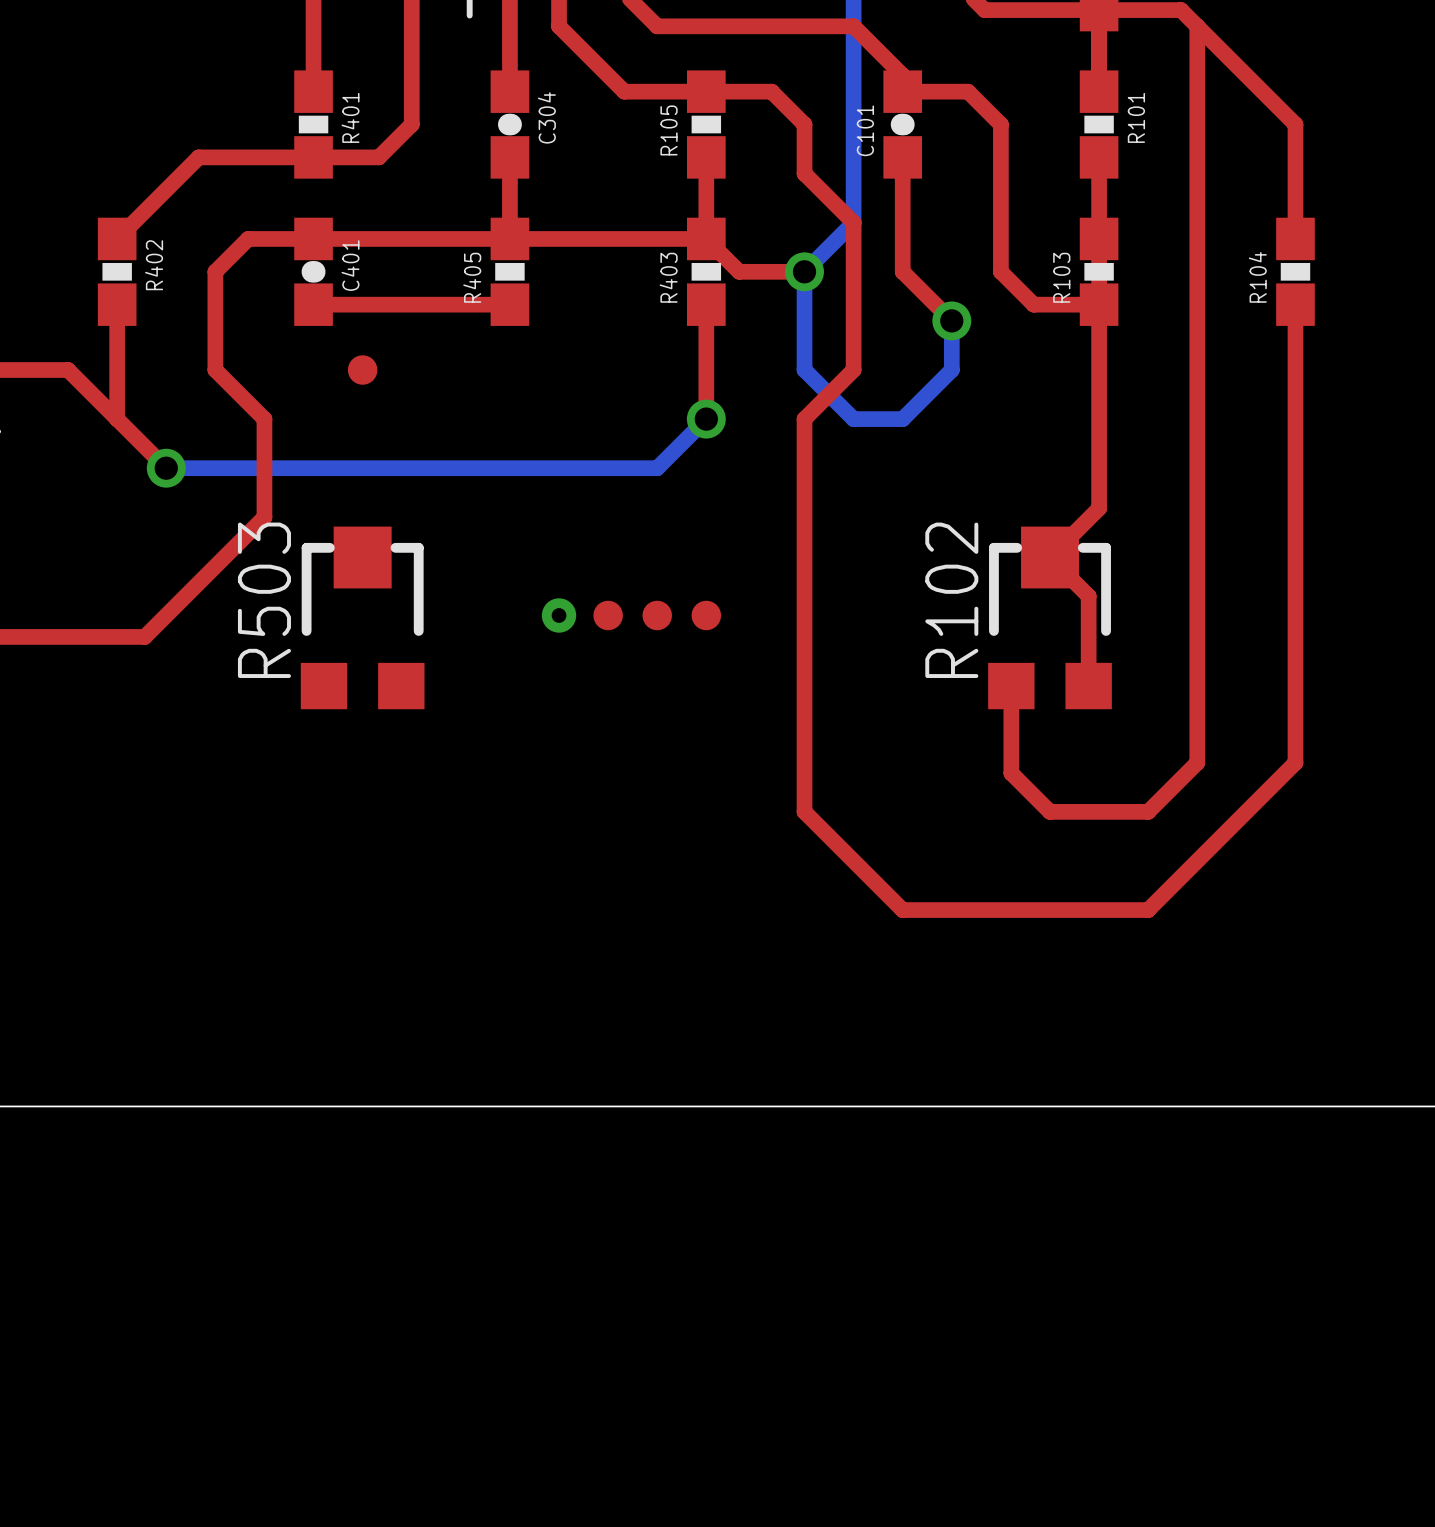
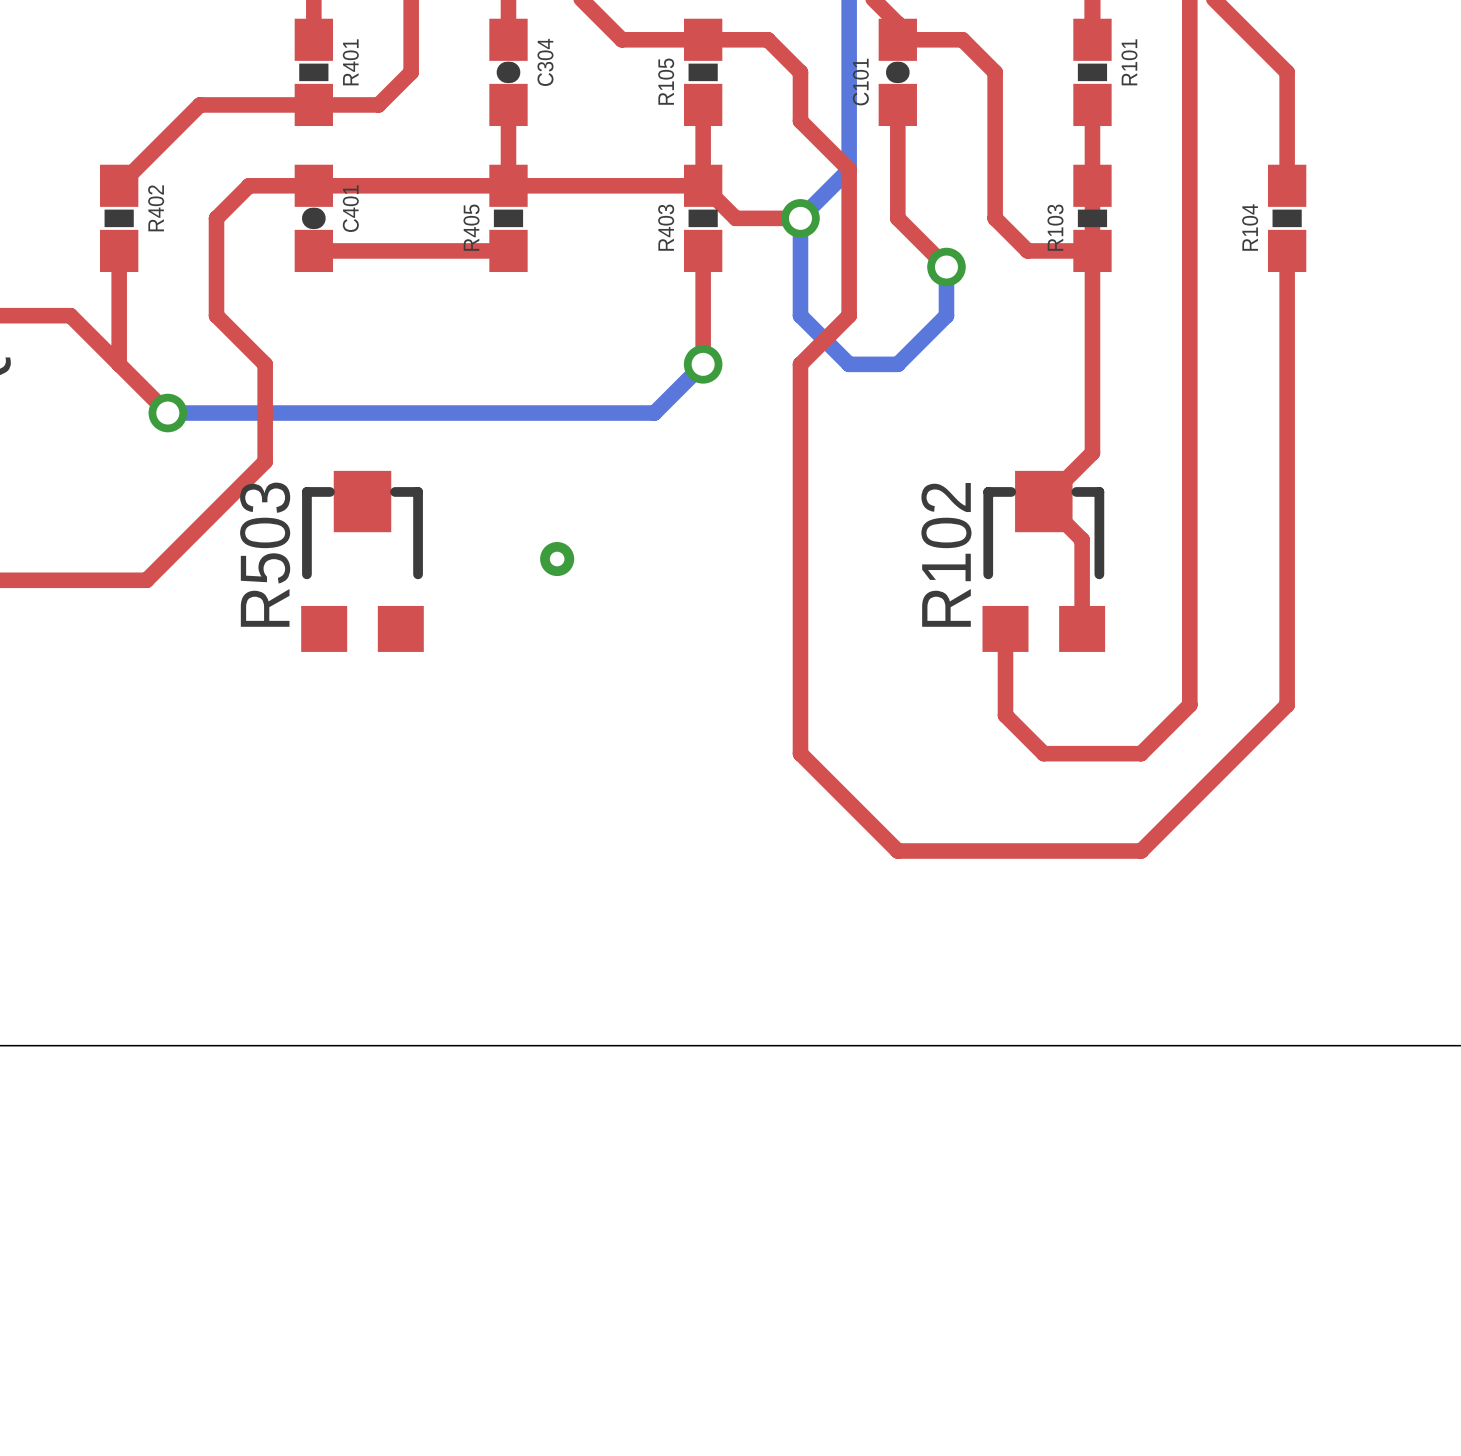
part: (362, 370) -> none
part: (608, 615) -> none
part: (657, 615) -> none
part: (706, 615) -> none

